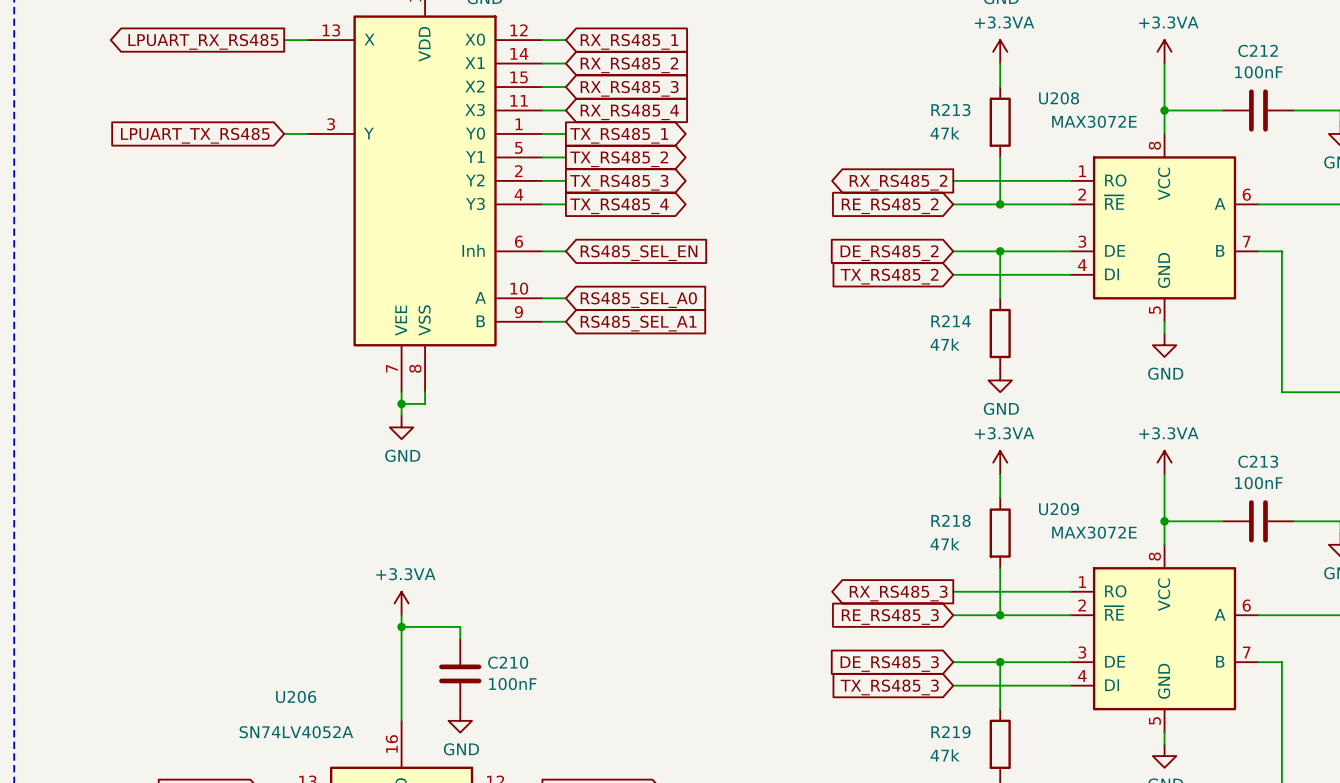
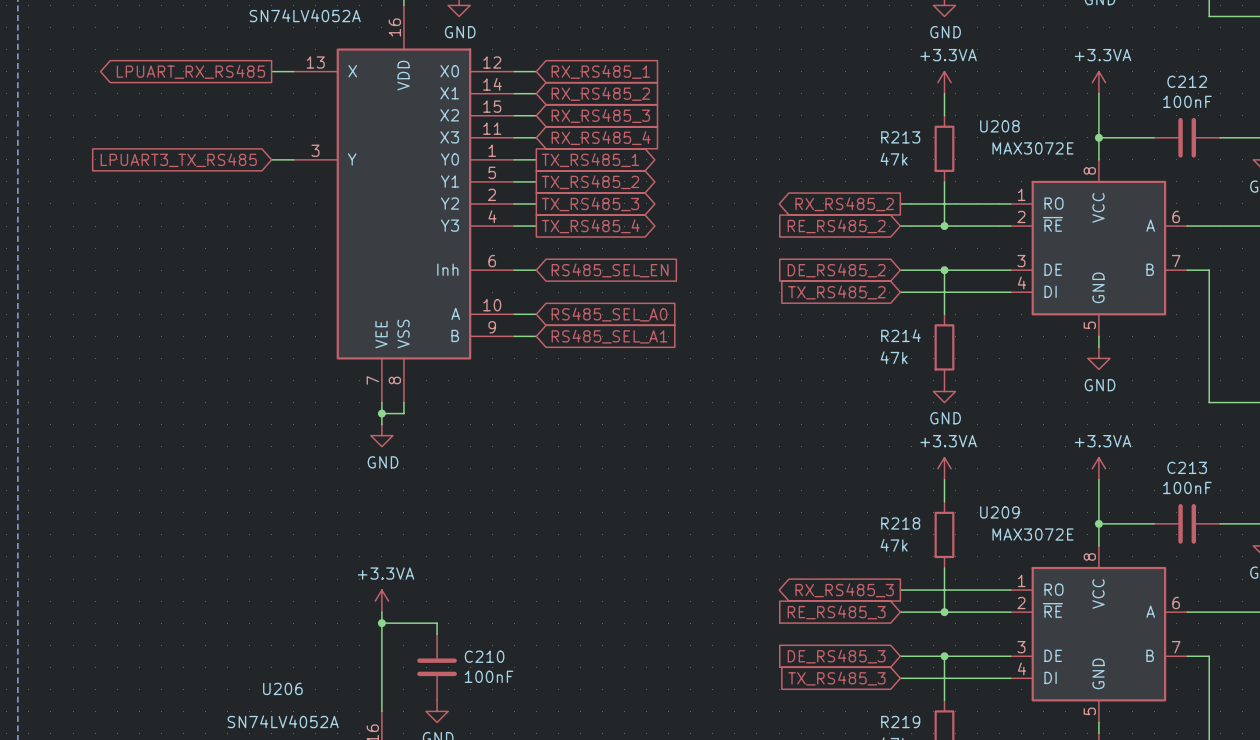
global label: LPUART_TX_RS485 (195, 135) -> LPUART3_TX_RS485 (178, 160)

